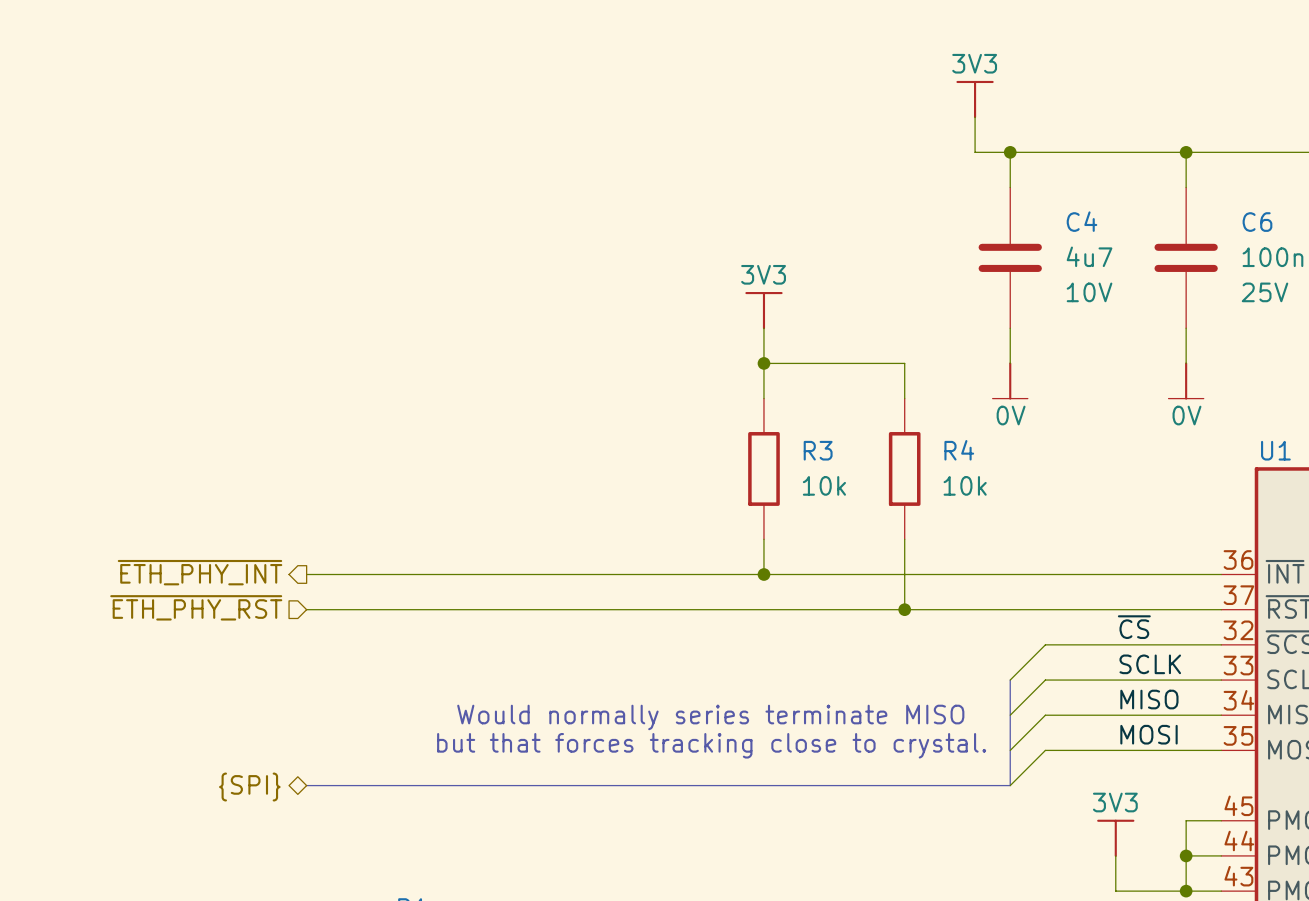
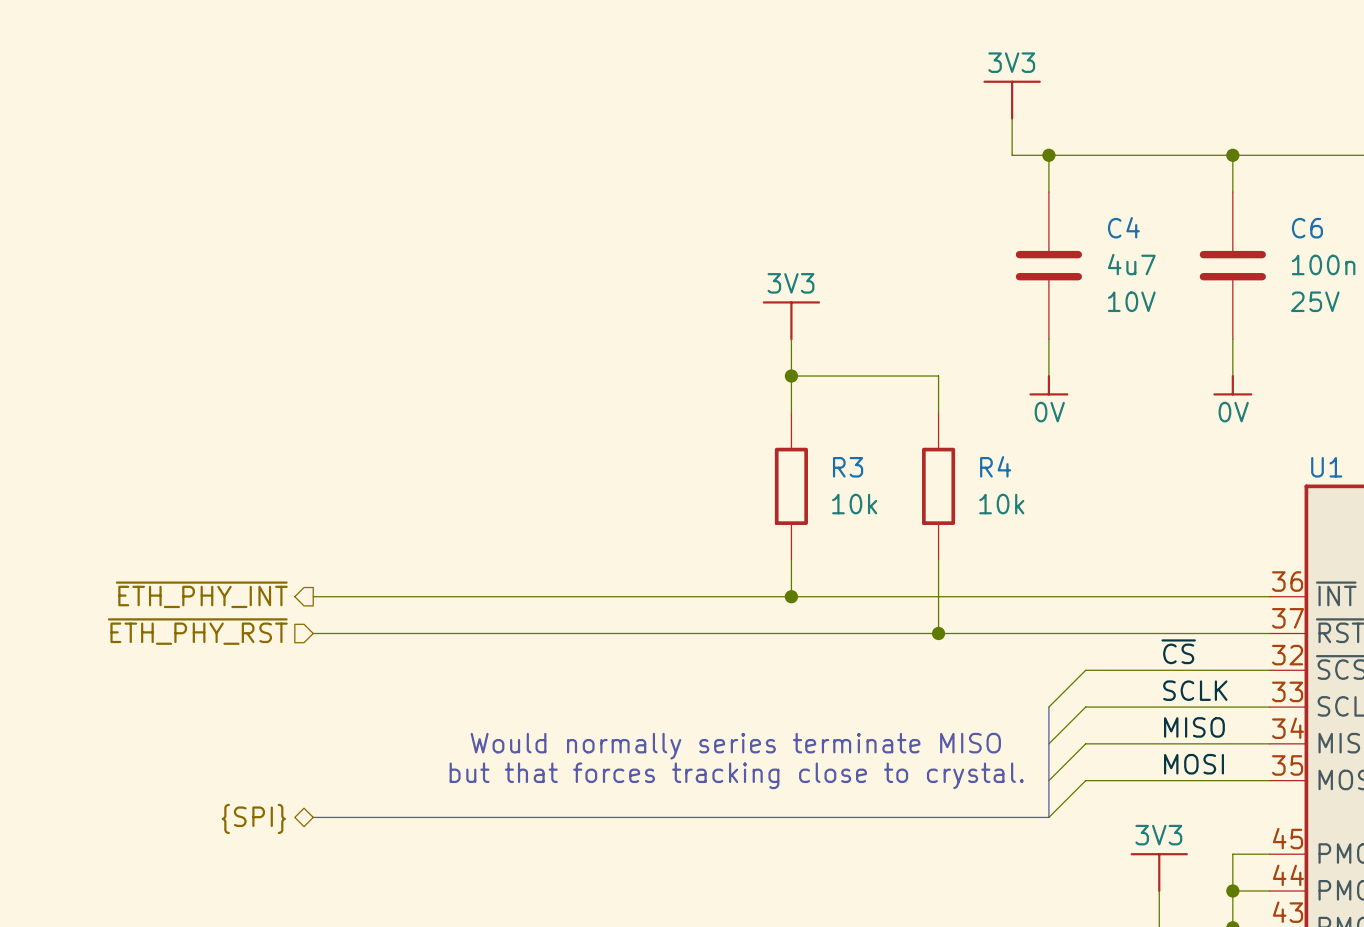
power symbol shape: [956, 80, 994, 119] -> [983, 80, 1041, 120]
power symbol shape: [745, 292, 783, 330] -> [762, 301, 821, 341]
power symbol shape: [992, 362, 1028, 400] -> [1029, 374, 1069, 396]
power symbol shape: [1168, 362, 1204, 400] -> [1213, 374, 1253, 396]
power symbol shape: [1097, 819, 1135, 857] -> [1130, 853, 1188, 893]

